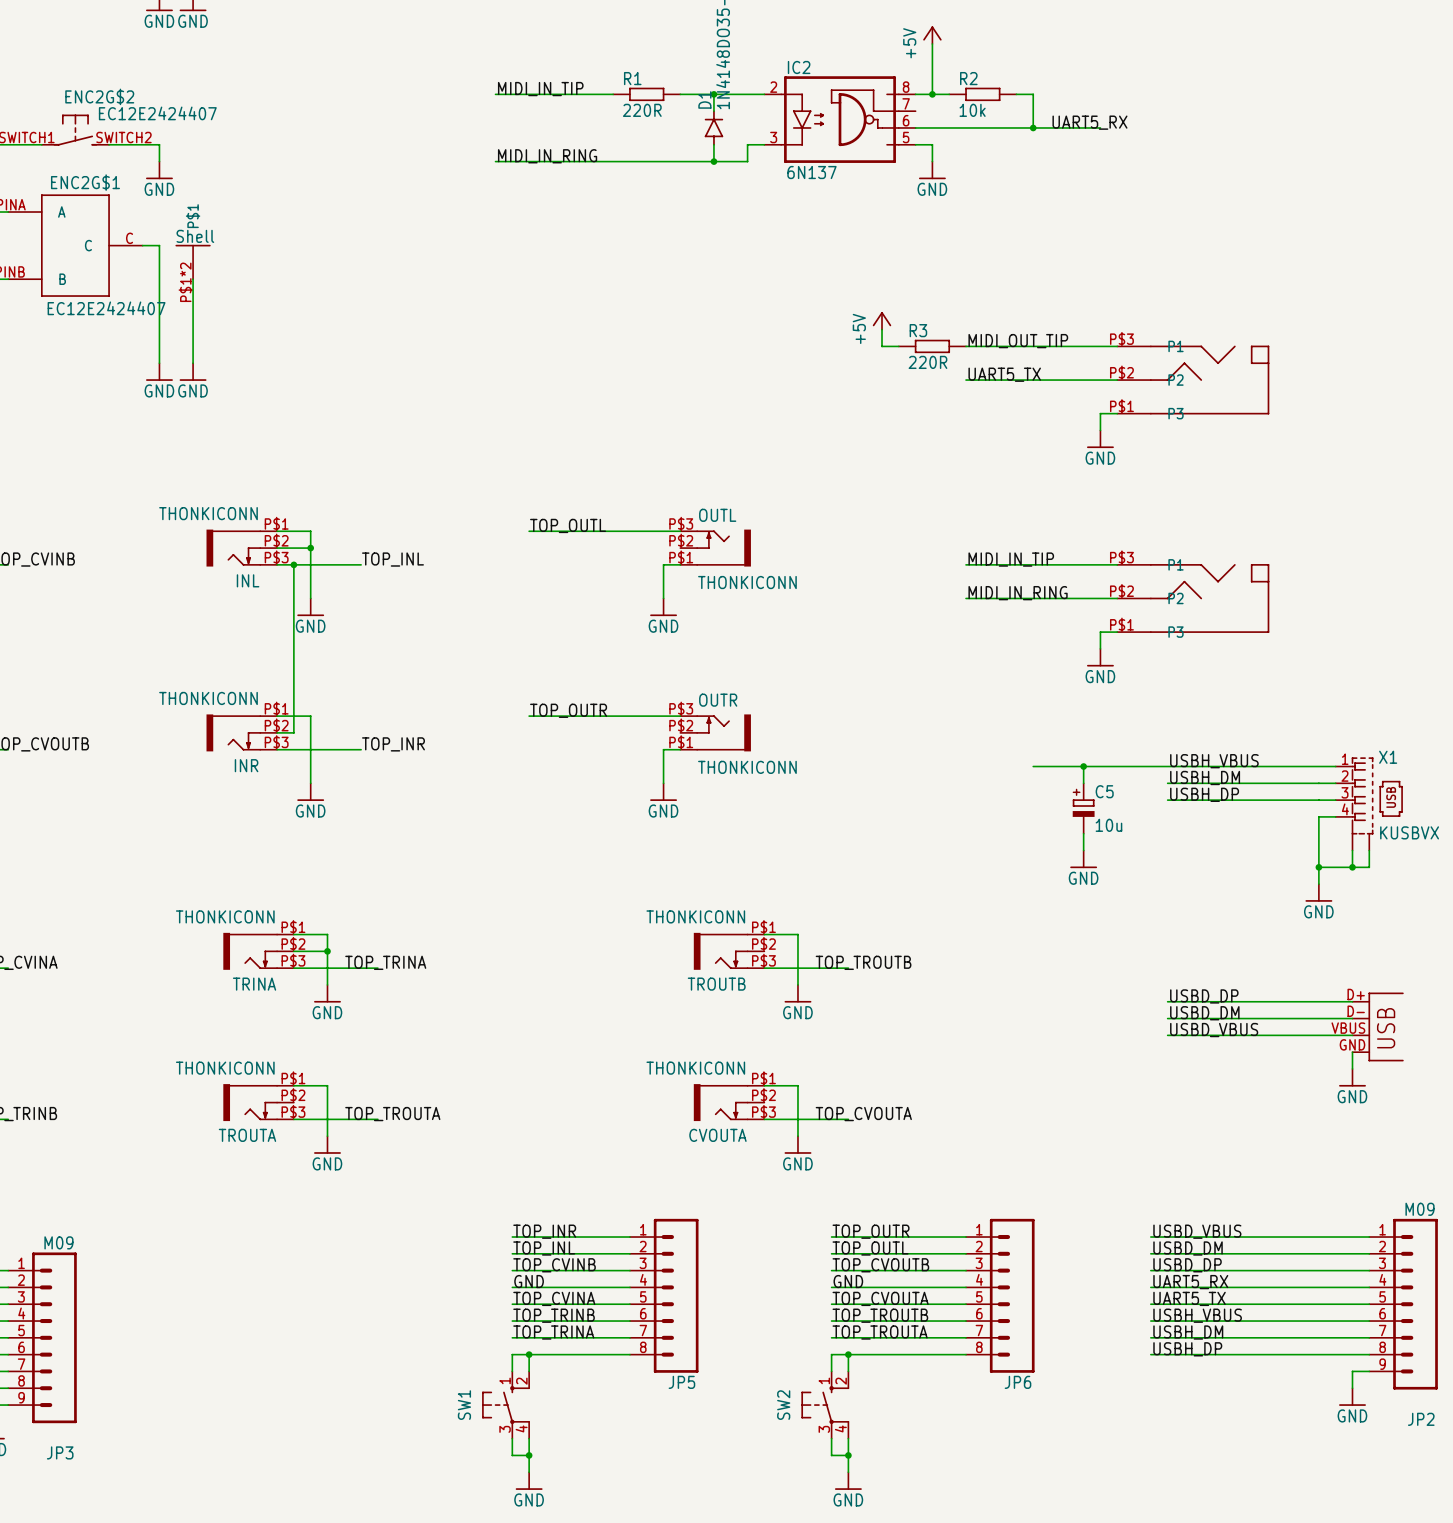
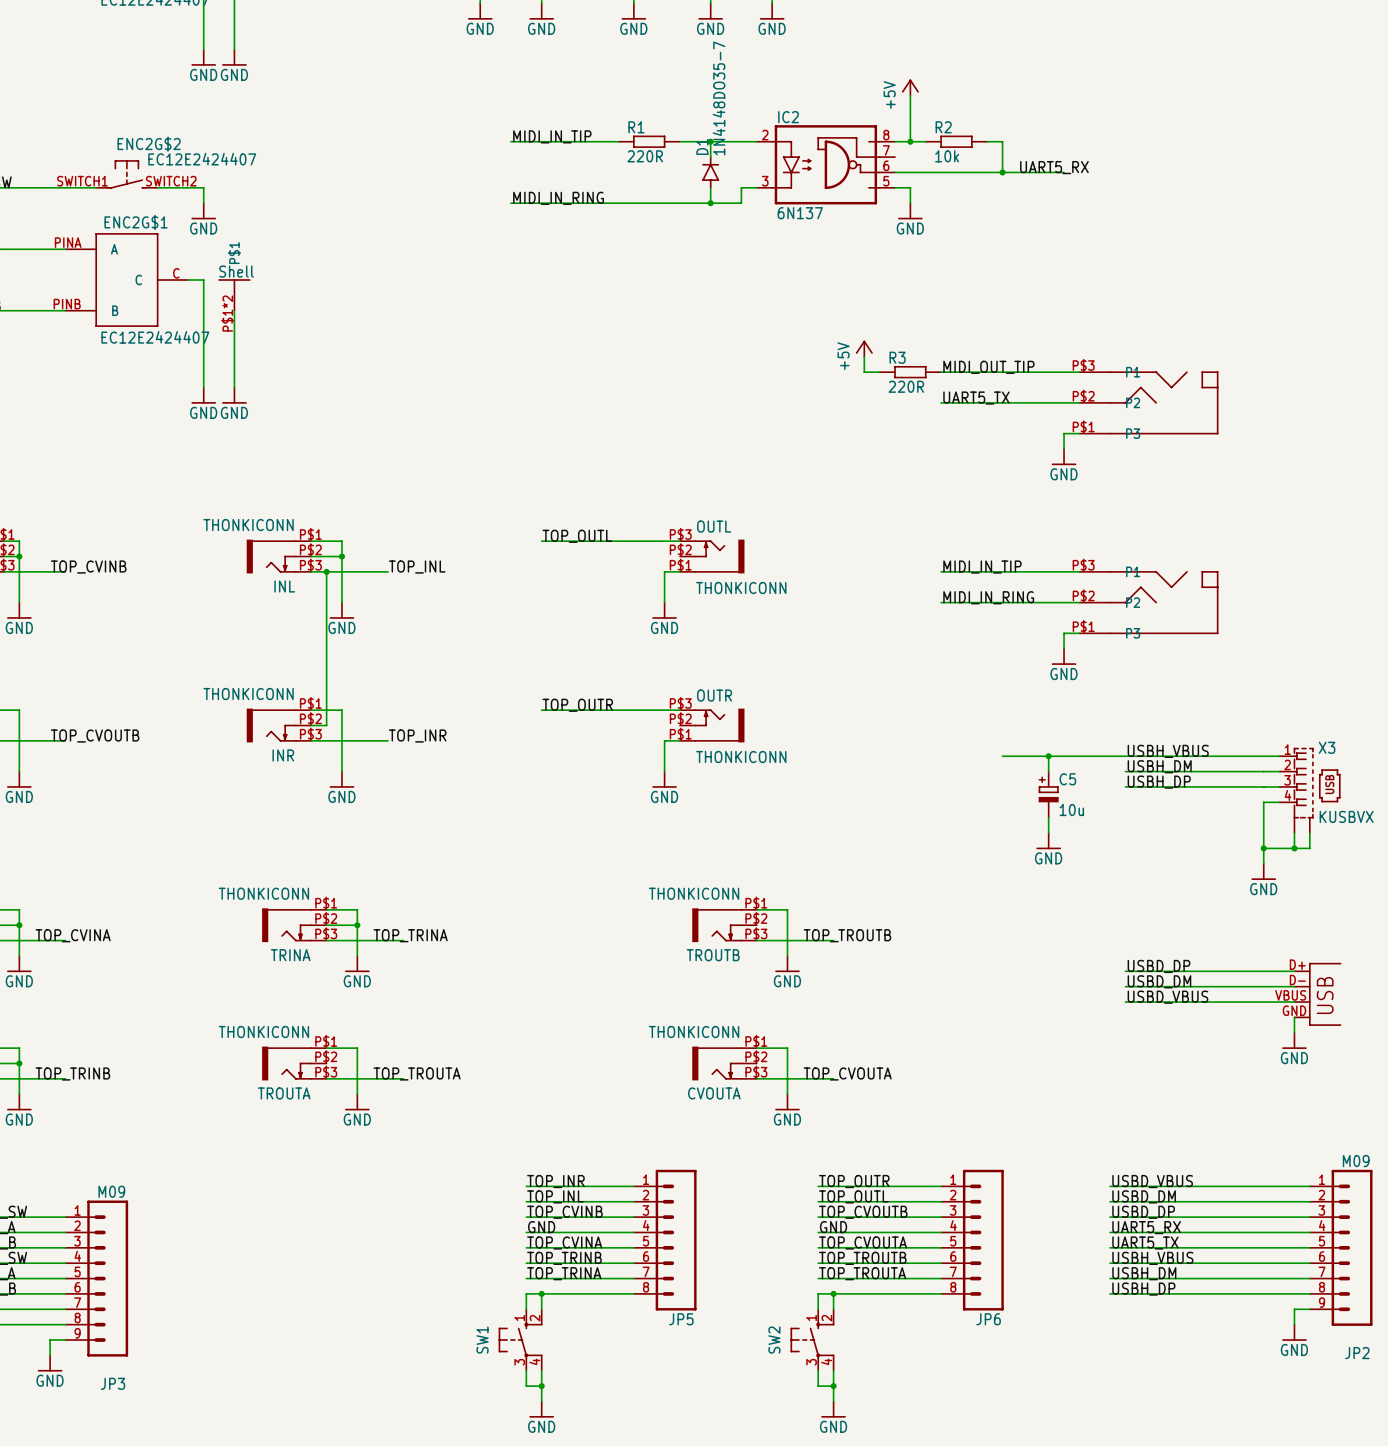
X1 name: X1 (1388, 757) -> X3 (1327, 747)

